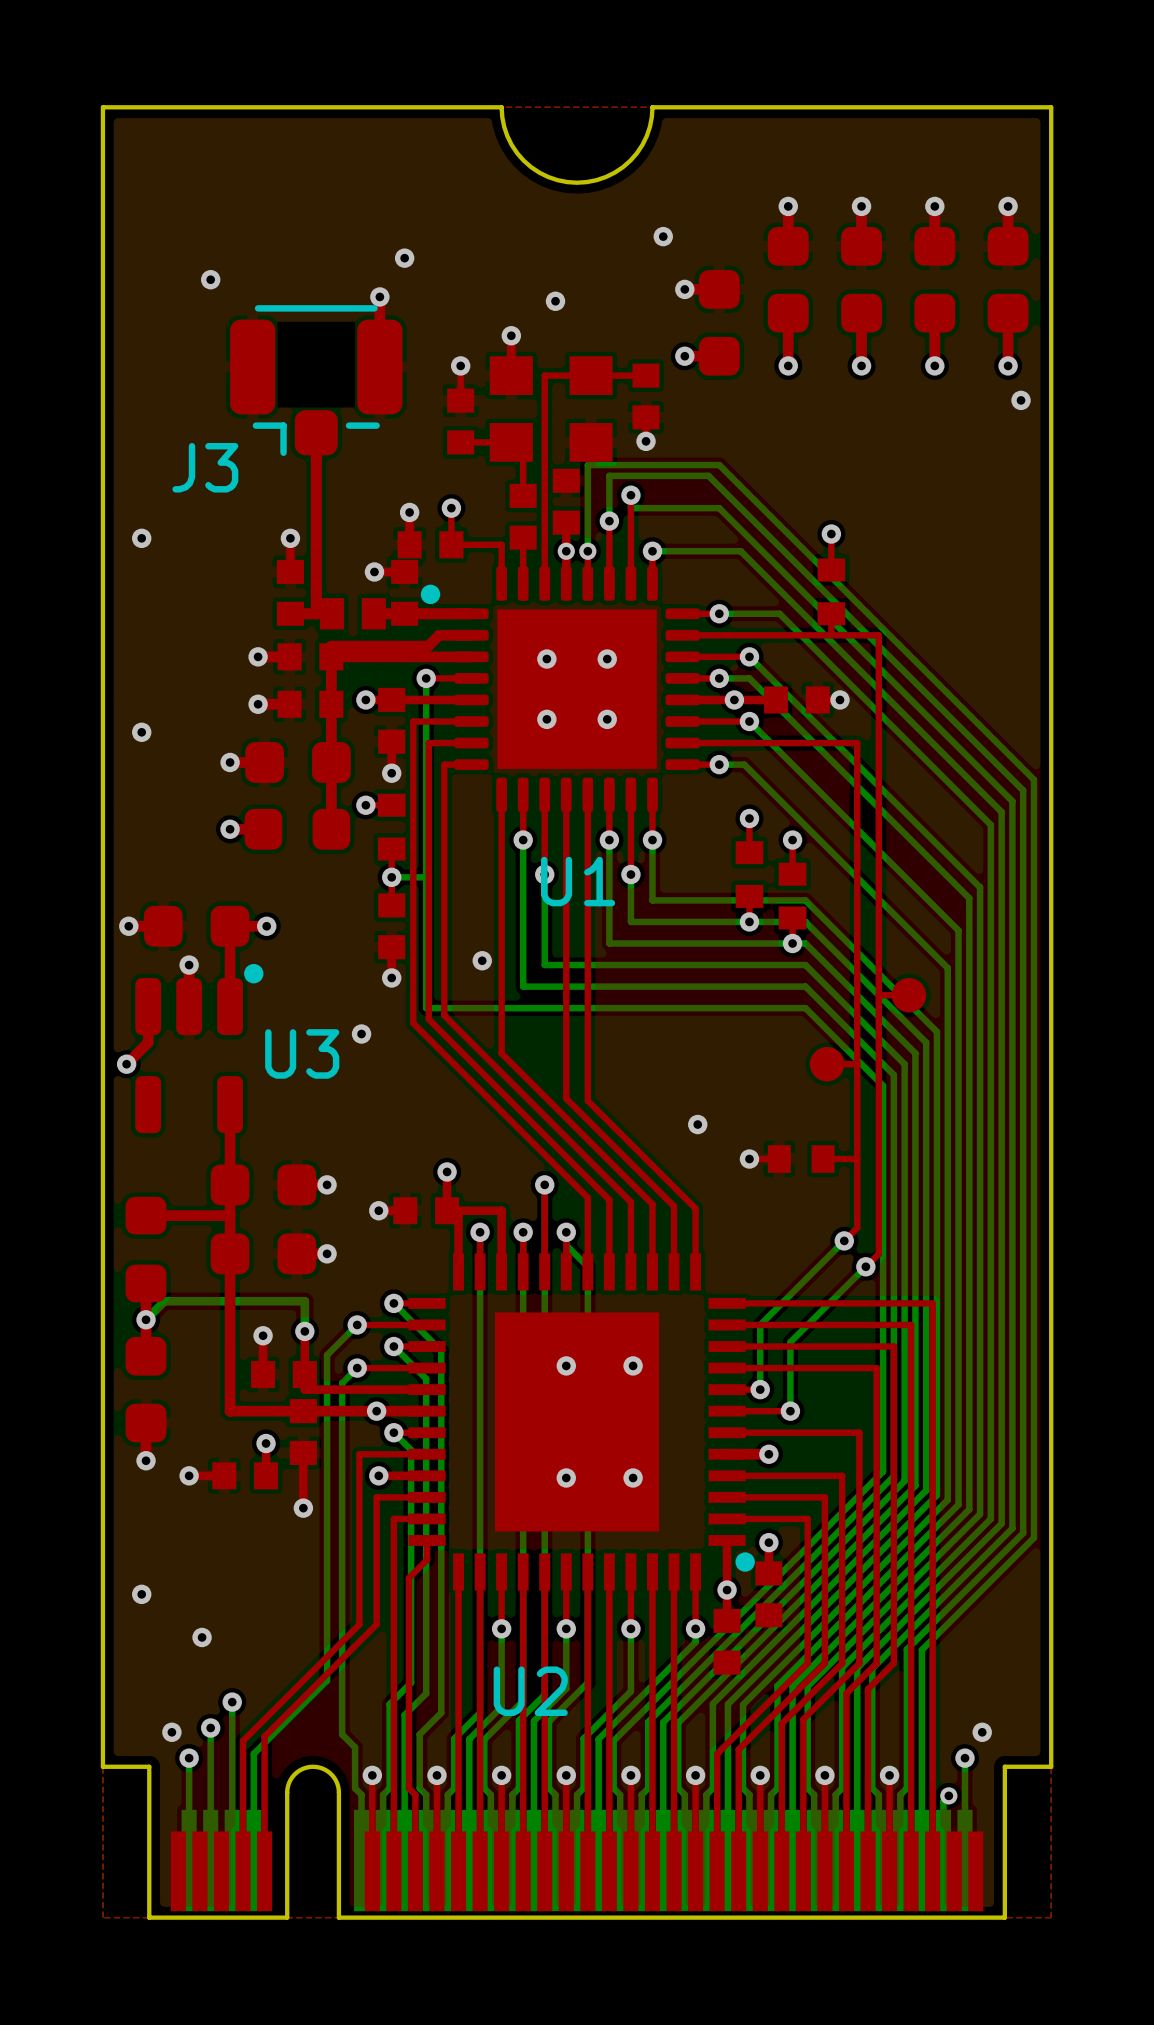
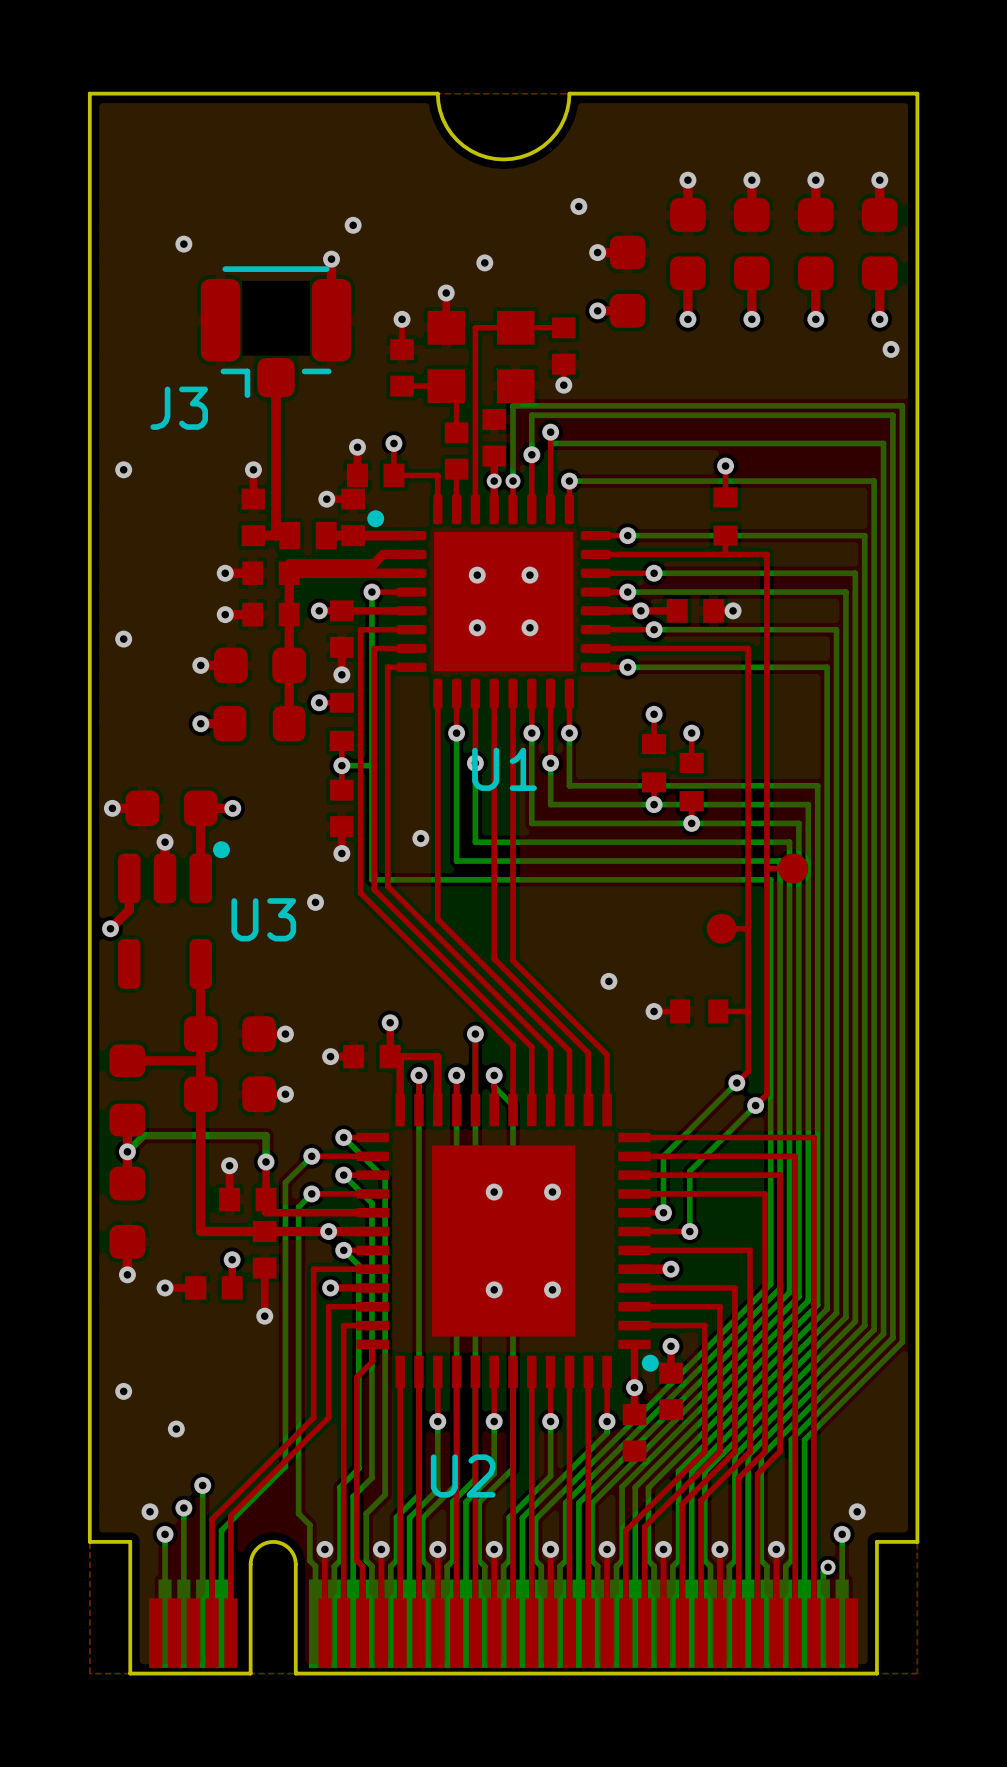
bottom track: (719, 465) (1033, 779) -> (627, 405) (902, 405) (902, 680)
bottom track: (708, 475) (1023, 790) -> (618, 415) (892, 415) (892, 689)
bottom track: (719, 508) (1012, 801) -> (627, 443) (883, 443) (883, 699)
bottom track: (740, 551) (1001, 812) -> (646, 481) (874, 481) (874, 708)
bottom track: (779, 613) (990, 824) -> (680, 535) (864, 535) (864, 719)
bottom track: (749, 656) (980, 887) -> (654, 573) (855, 573) (855, 774)
bottom track: (749, 678) (969, 898) -> (654, 592) (845, 592) (845, 783)
bottom track: (749, 721) (958, 930) -> (654, 629) (836, 629) (836, 812)
bottom track: (744, 764) (947, 968) -> (649, 667) (827, 667) (827, 844)
bottom track: (805, 900) (936, 1031) -> (702, 785) (817, 785) (817, 900)
bottom track: (805, 921) (926, 1042) -> (702, 804) (808, 804) (808, 909)
bottom track: (805, 943) (915, 1053) -> (702, 823) (798, 823) (798, 919)
bottom track: (805, 965) (904, 1064) -> (702, 842) (789, 842) (789, 928)
bottom track: (805, 986) (893, 1074) -> (702, 861) (780, 861) (780, 938)
bottom track: (805, 1008) (883, 1085) -> (702, 879) (770, 879) (770, 947)

